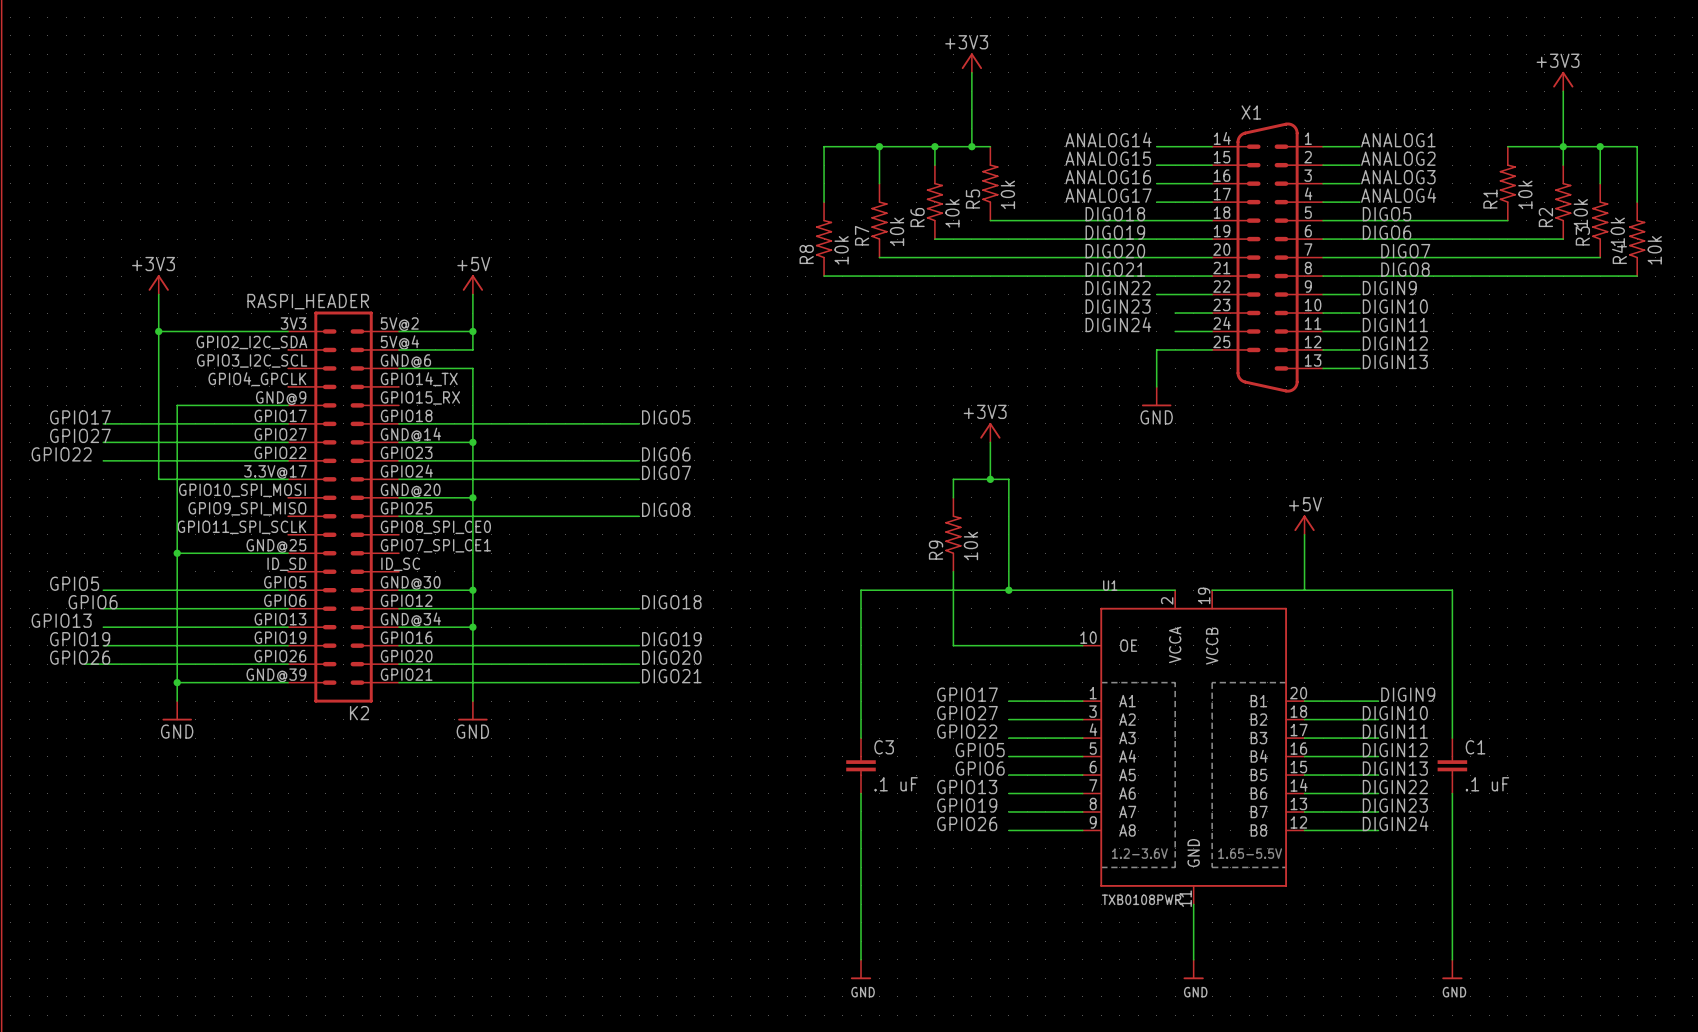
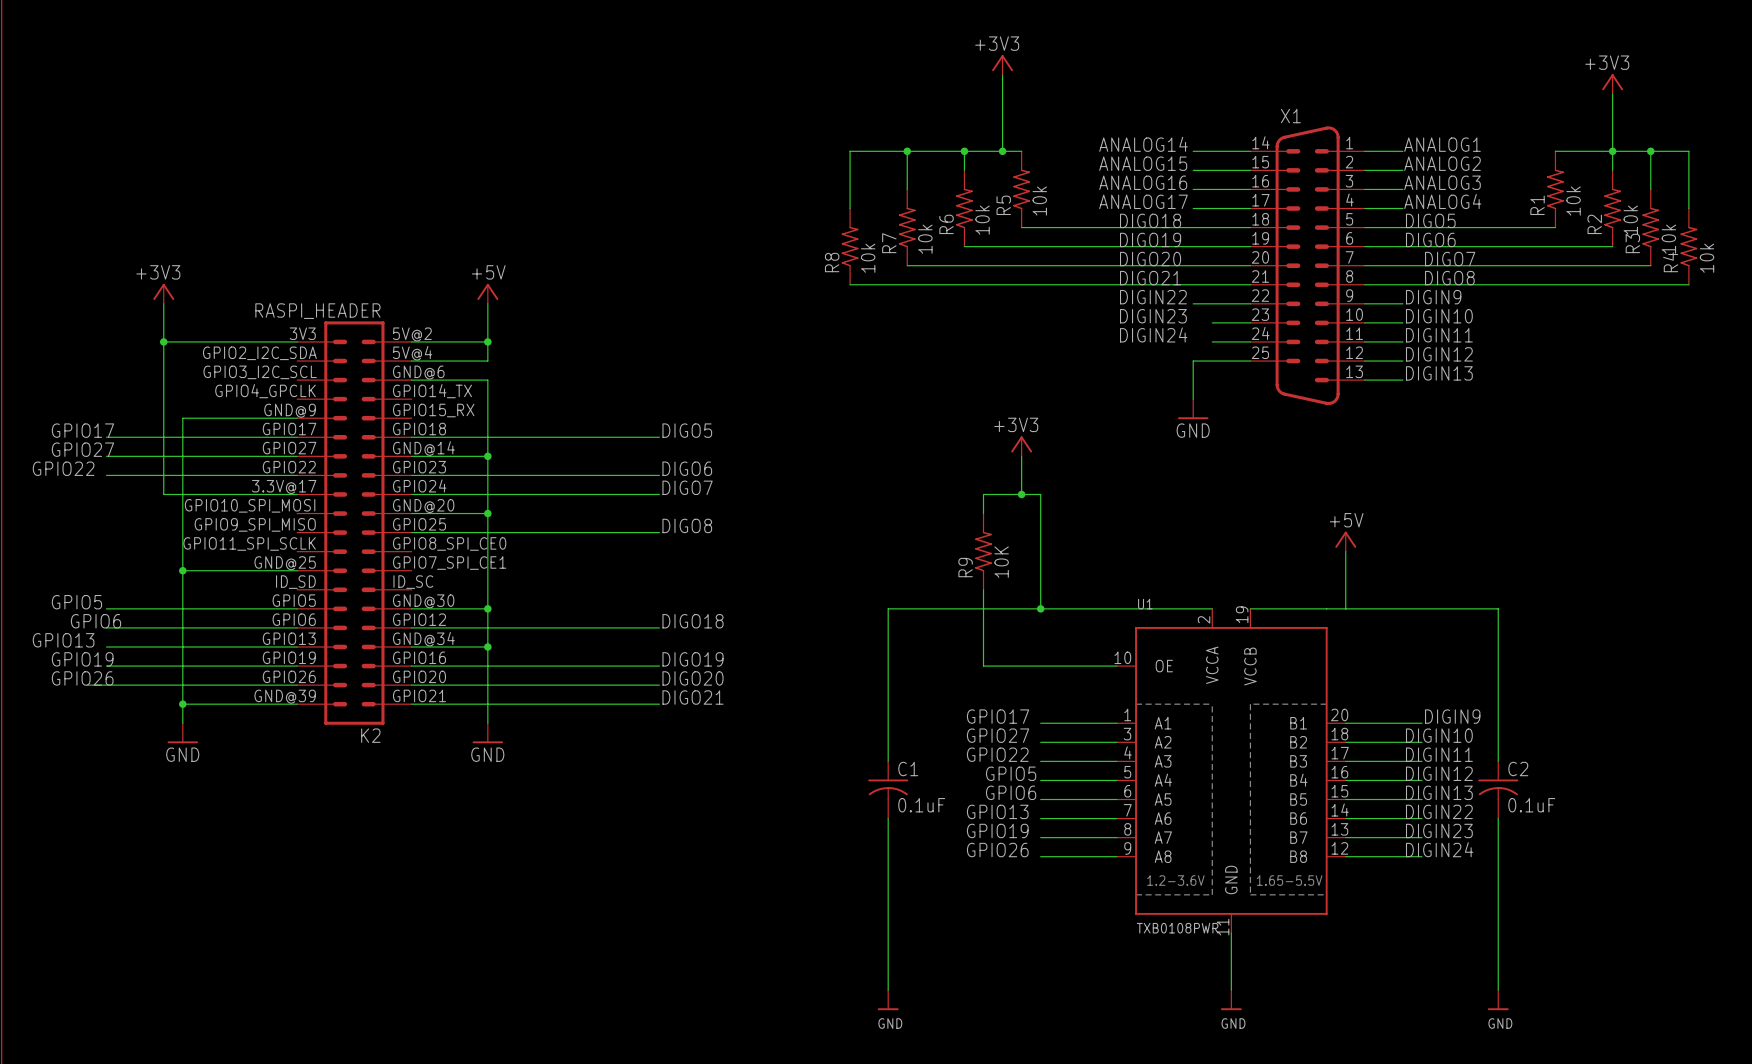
R9 value: 10k (970, 546) -> 10K (1001, 562)
C1 symbol: [1437, 738, 1468, 794] -> [868, 761, 909, 819]
C3: .1 uF (861, 765) -> none
C2: none -> 0.1uF (1498, 789)
C1 value: .1 uF (1487, 784) -> 0.1uF (921, 805)

